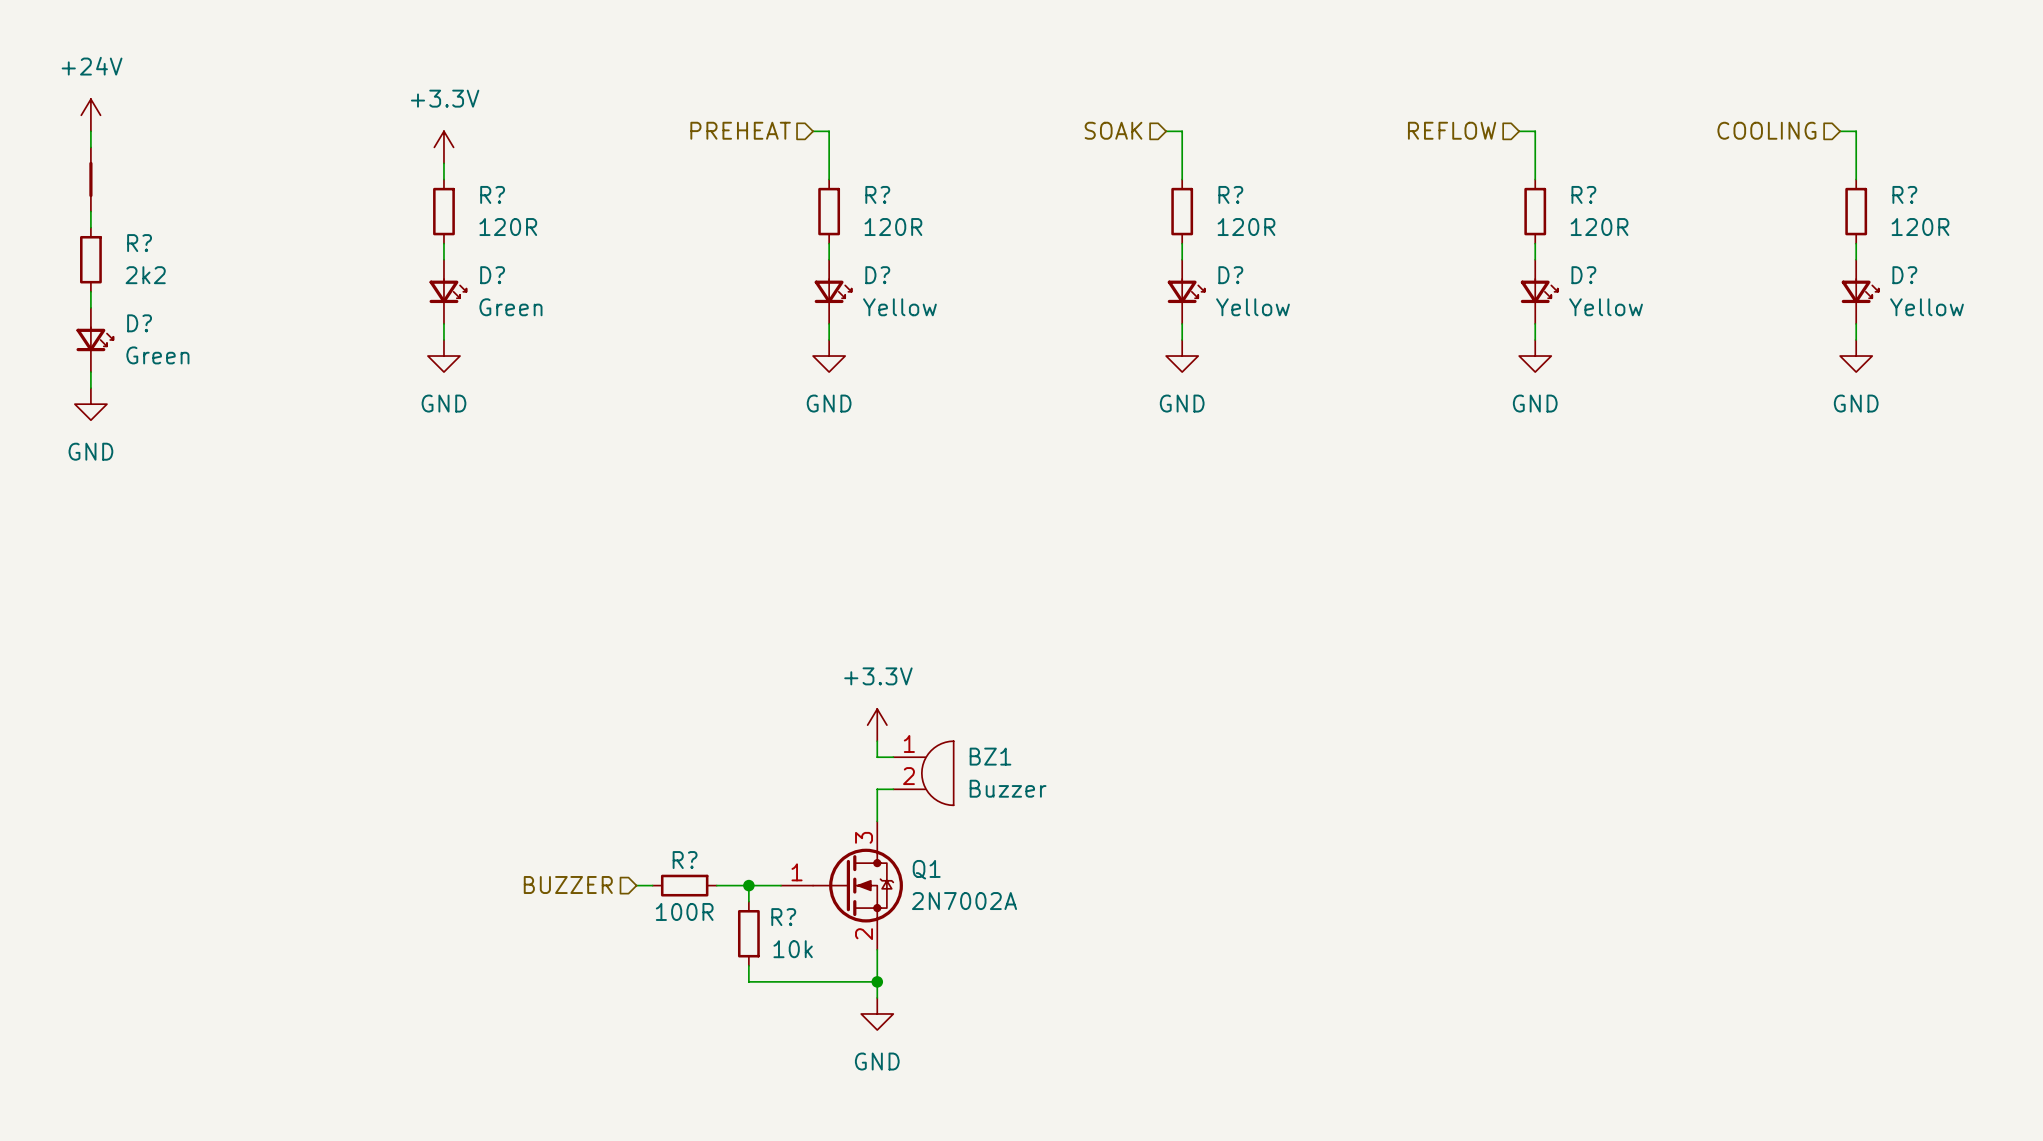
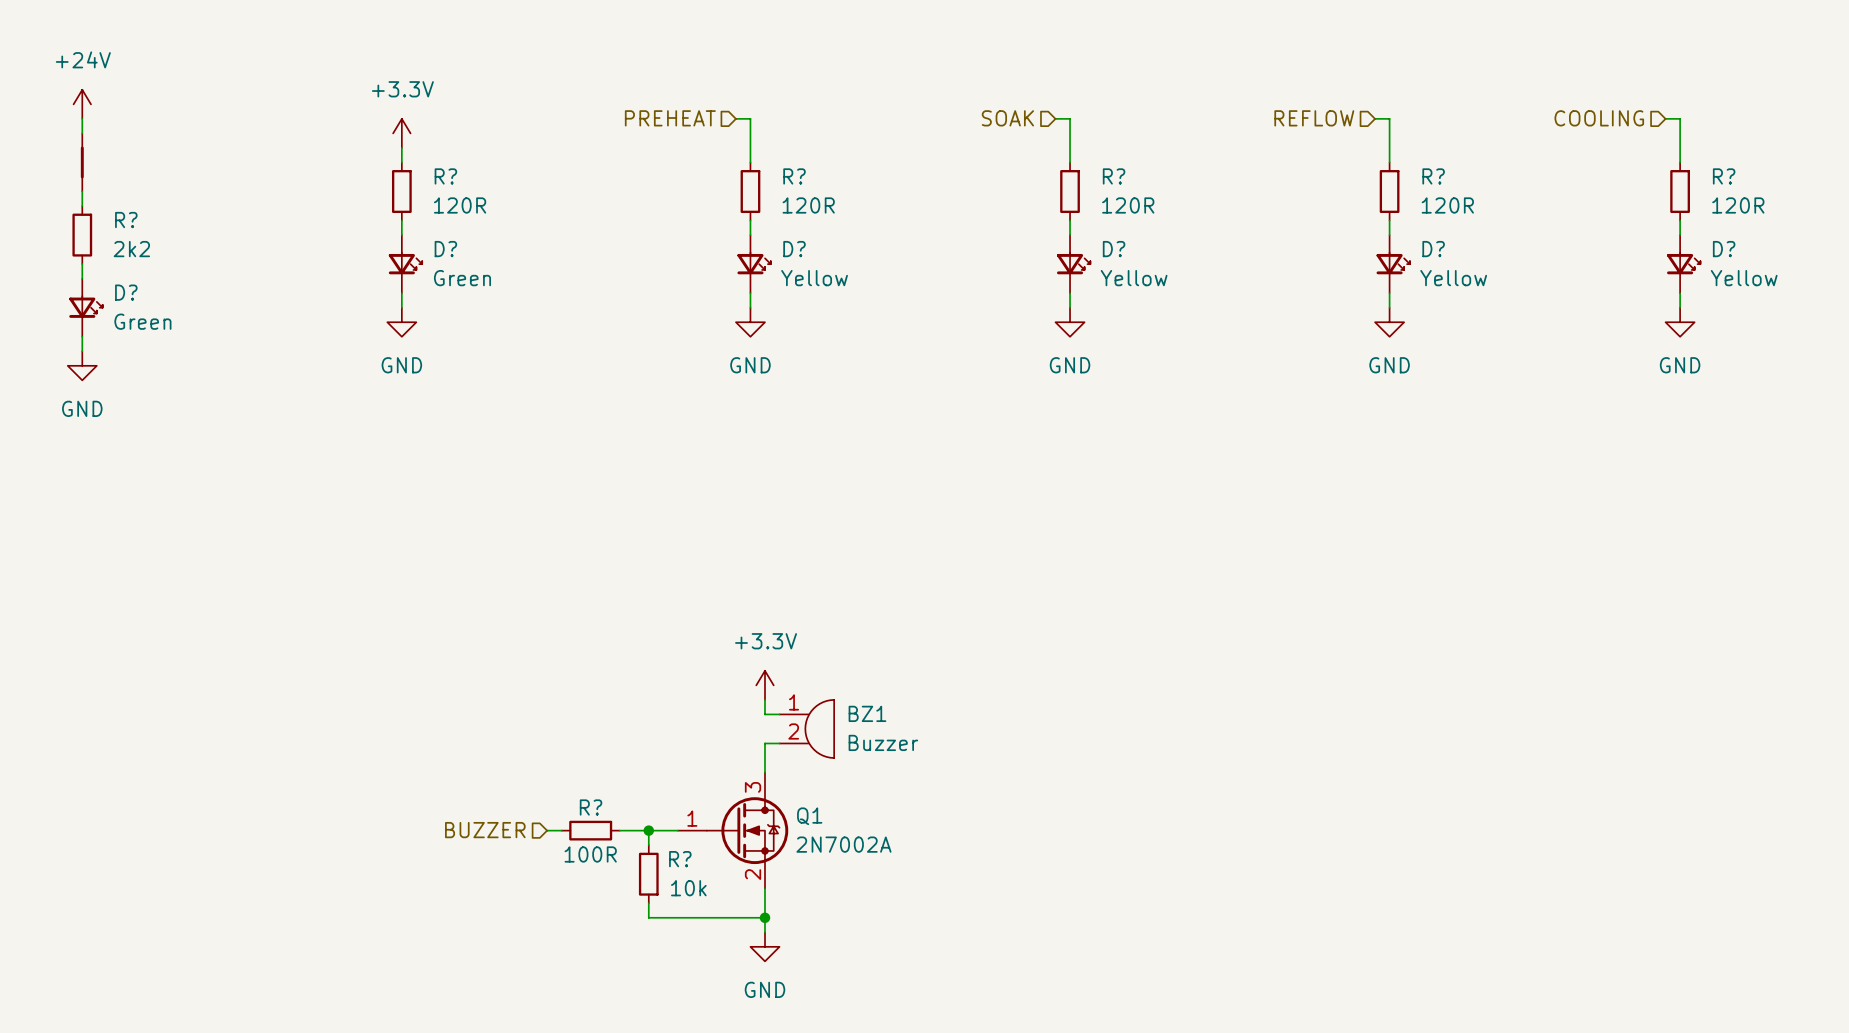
power symbol position: +3.3V (877, 725) -> +3.3V (764, 685)
wire: (877, 741) (877, 757) (893, 757) -> (764, 699) (764, 714) (779, 714)
BZ1 position: (923, 773) -> (806, 728)
wire: (893, 789) (877, 789) (877, 821) -> (779, 743) (764, 743) (764, 772)
hierarchical label position: BUZZER (568, 885) -> BUZZER (485, 830)
wire: (636, 885) (652, 885) -> (547, 830) (561, 830)
R? position: (684, 885) -> (590, 830)
wire: (716, 885) (780, 885) -> (619, 830) (677, 830)
wire: (748, 885) (748, 901) -> (648, 830) (648, 845)
junction position: (748, 885) -> (648, 830)
Q1 position: (841, 885) -> (733, 830)
R? position: (748, 933) -> (648, 874)
wire: (877, 949) (877, 997) -> (764, 888) (764, 932)
wire: (748, 965) (748, 981) (877, 981) -> (648, 903) (648, 917) (764, 917)
junction position: (877, 981) -> (764, 917)
power symbol position: GND (877, 1013) -> GND (764, 946)

